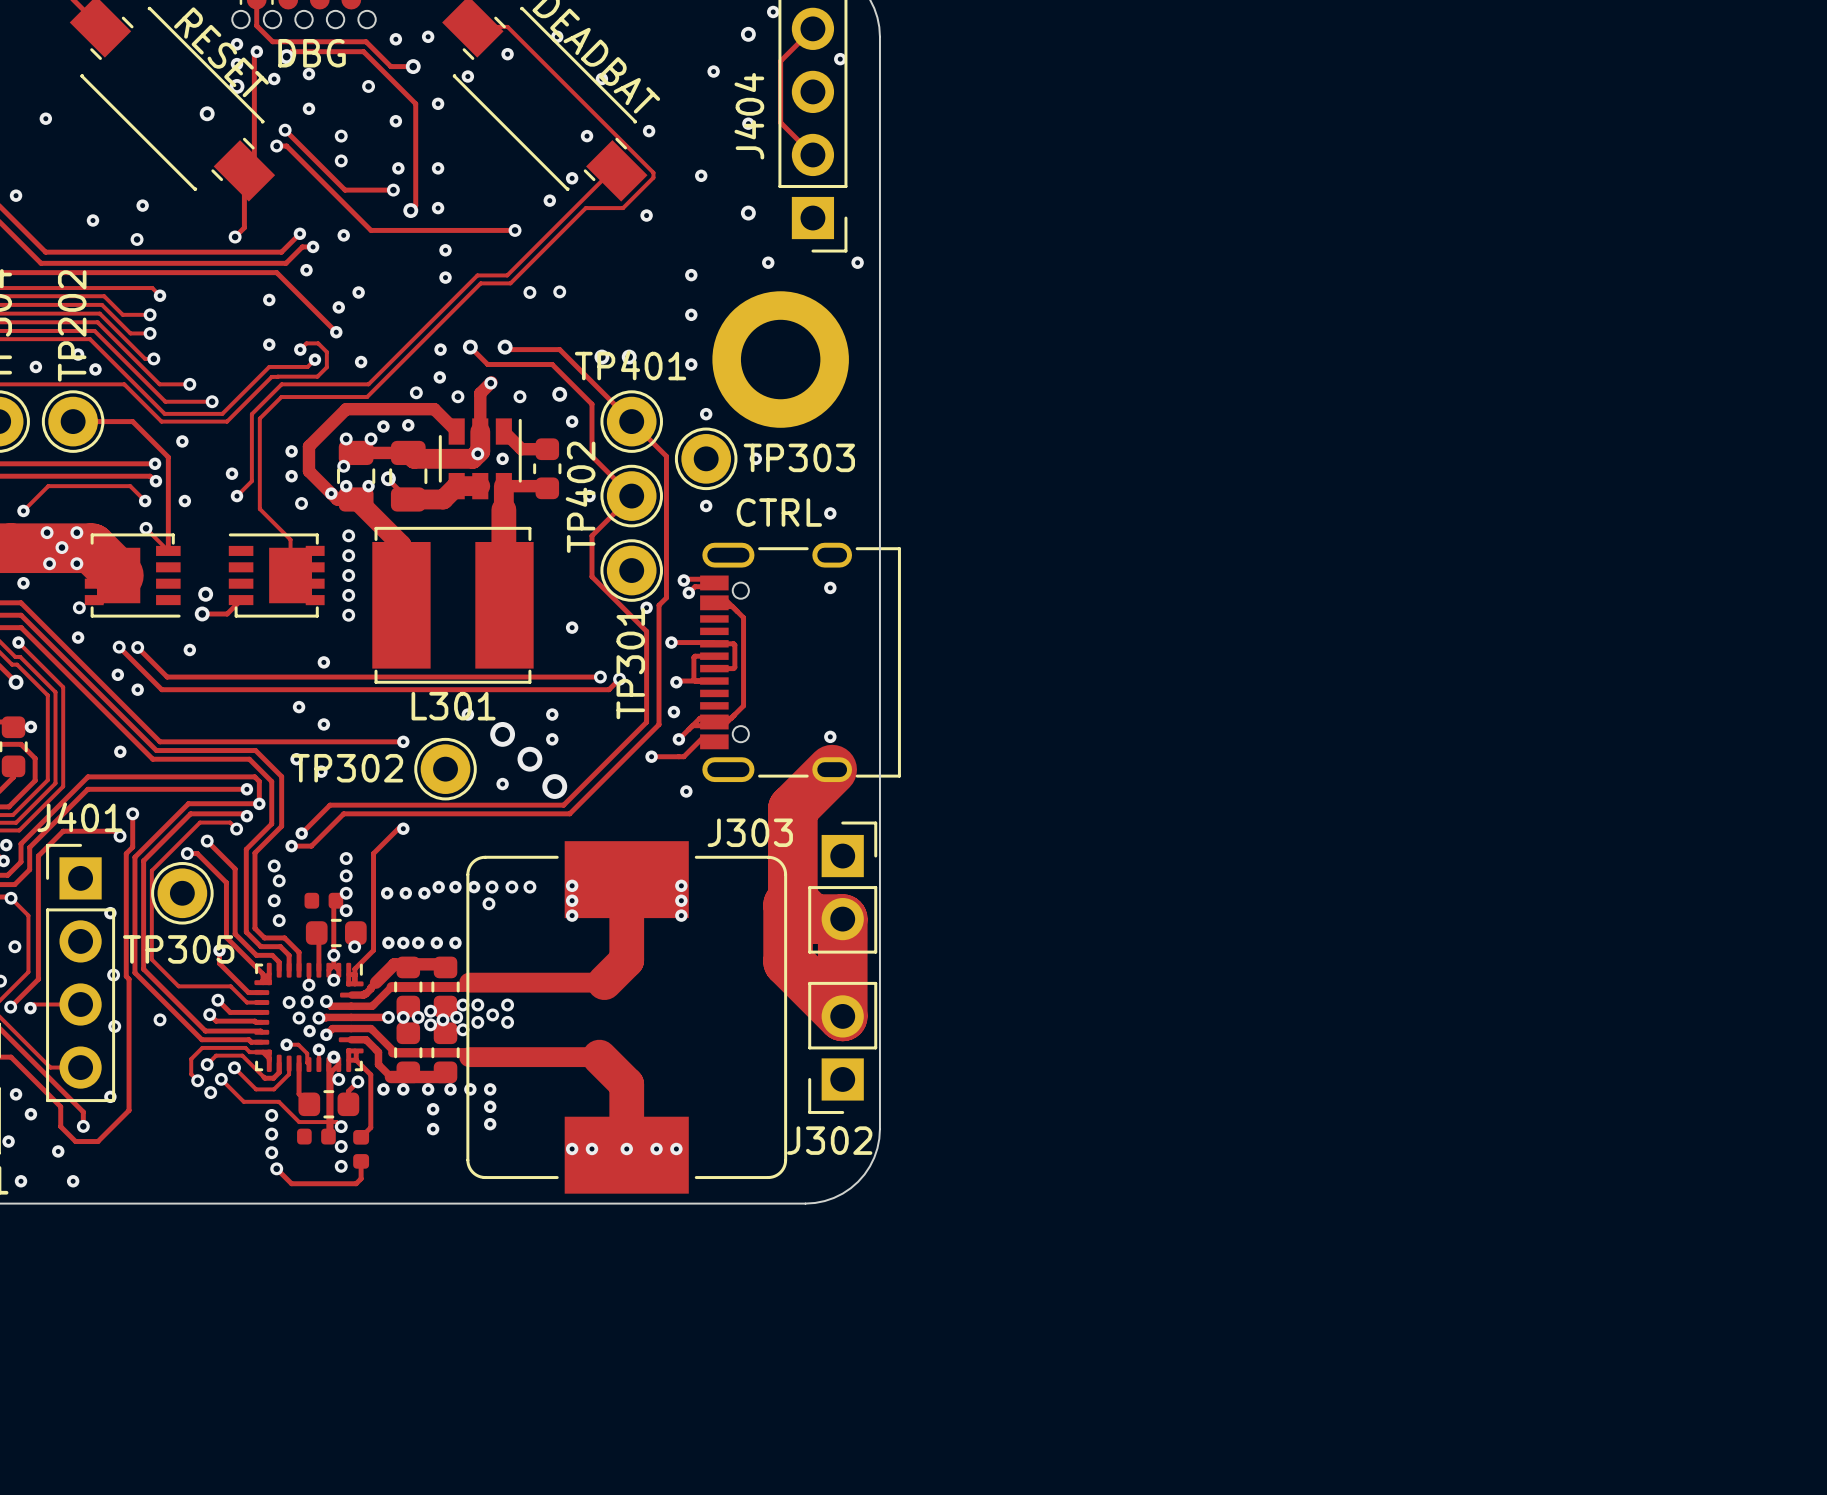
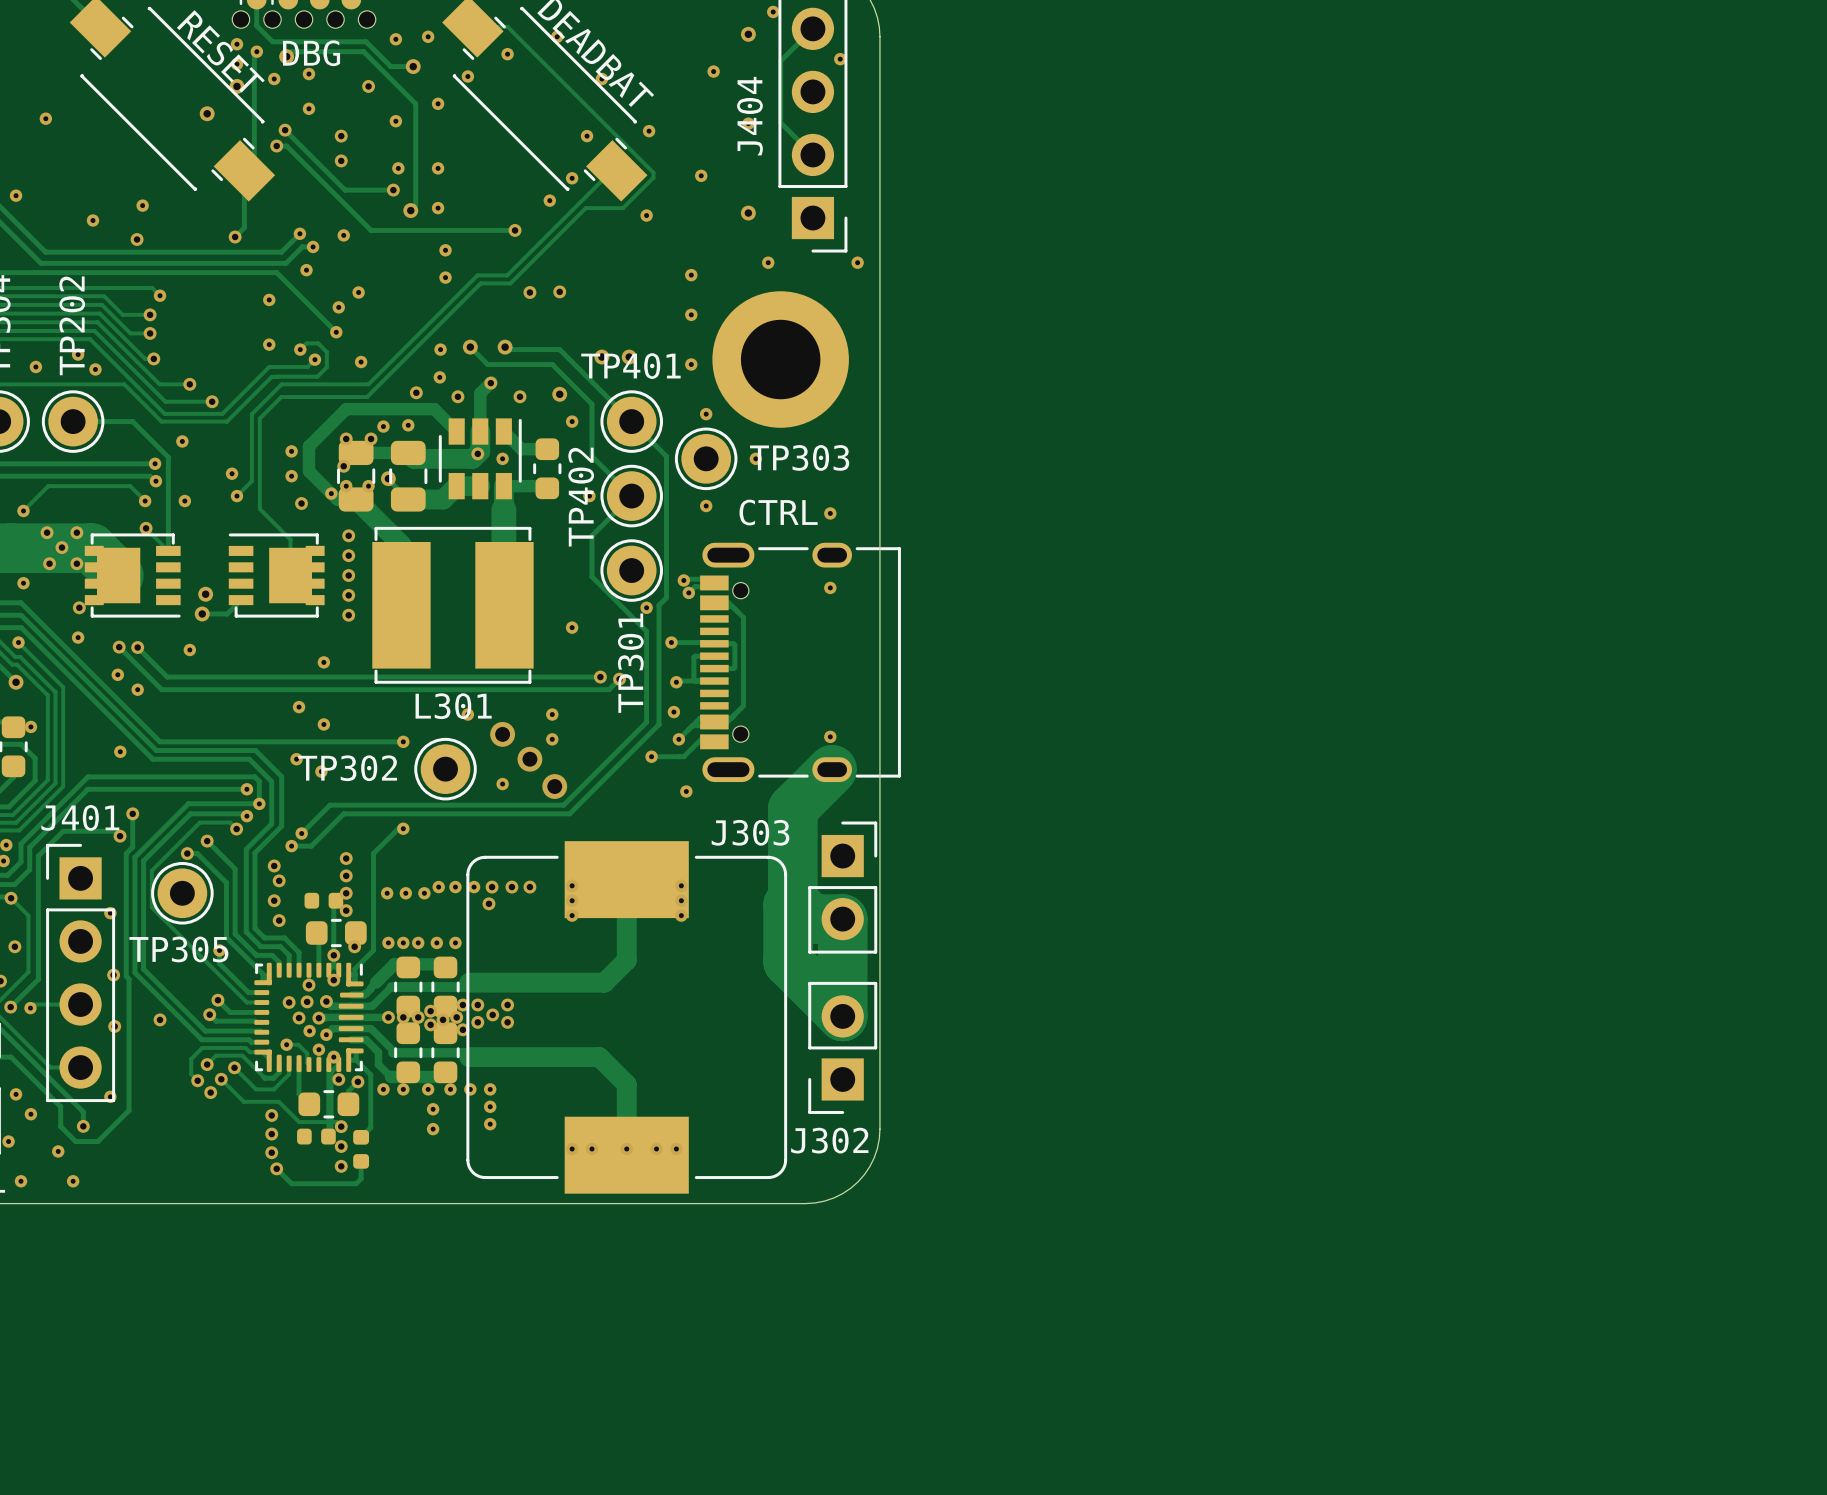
track width: thick (626, 879) (626, 960) (604, 982) -> thin (626, 879) (626, 960) (604, 982)
track: (151, 907) (151, 959) (178, 986) (230, 986) -> (151, 907) (230, 986)
track width: thick (599, 1057) (626, 1084) (626, 1148) -> thin (599, 1057) (626, 1084) (626, 1148)

